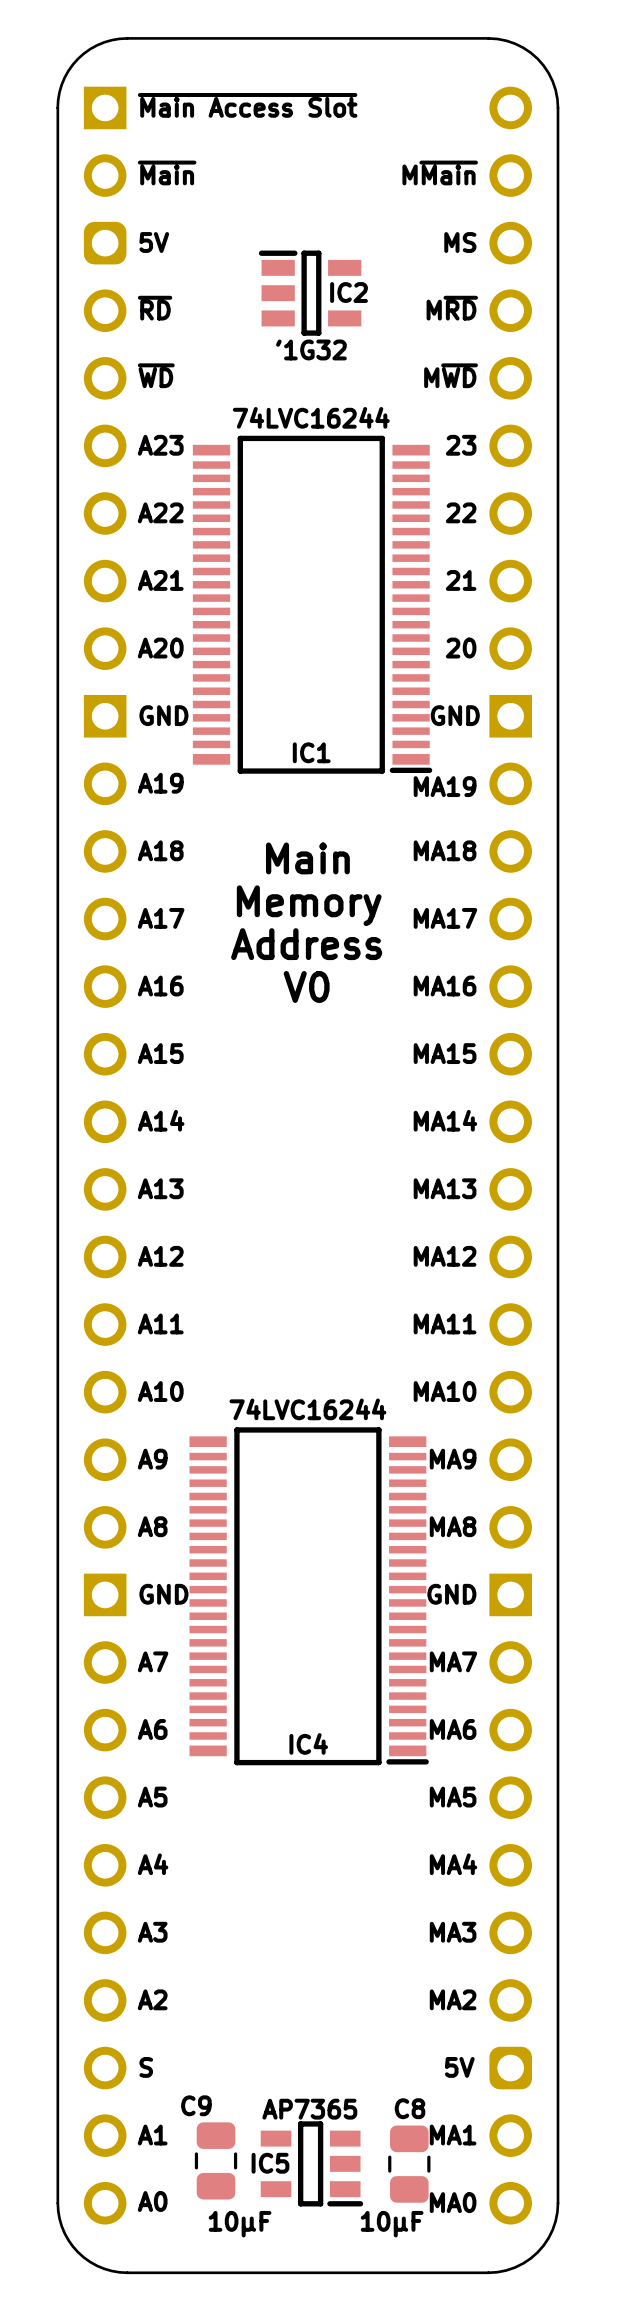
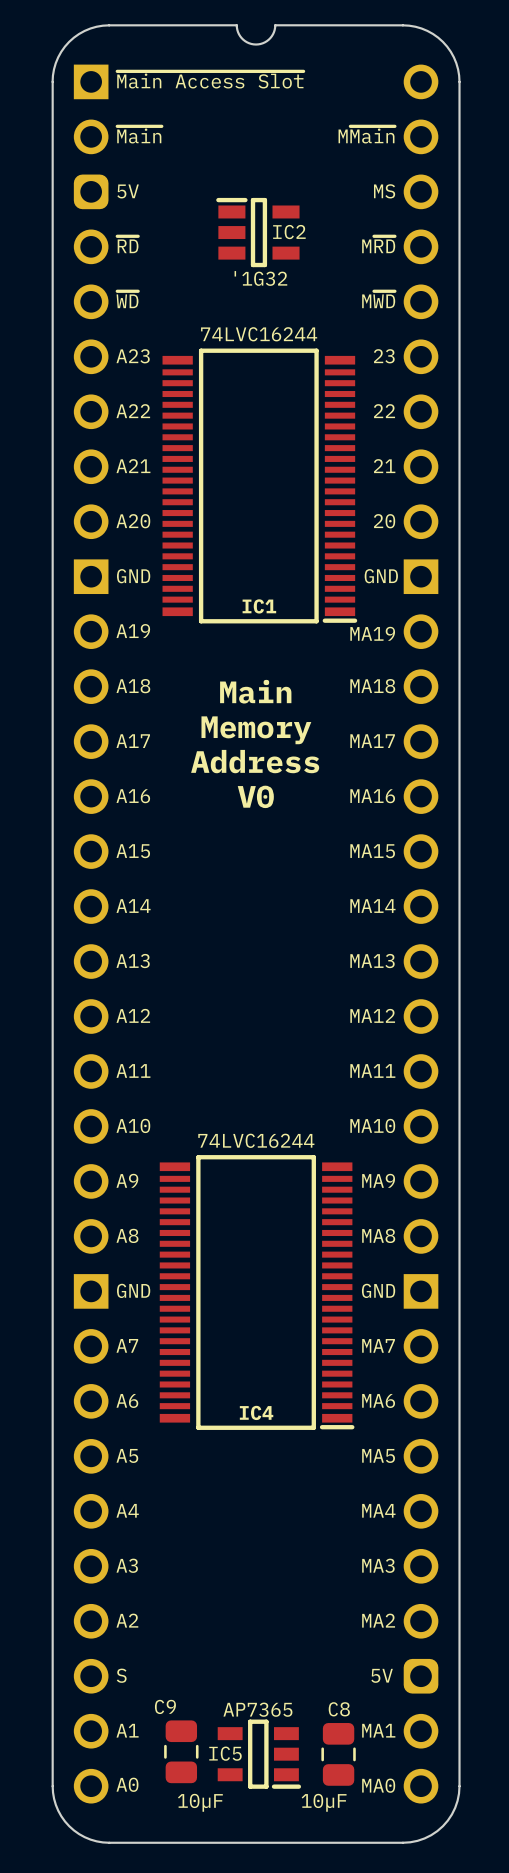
part footprint: [56, 37, 560, 2275] -> [51, 24, 461, 1844]

